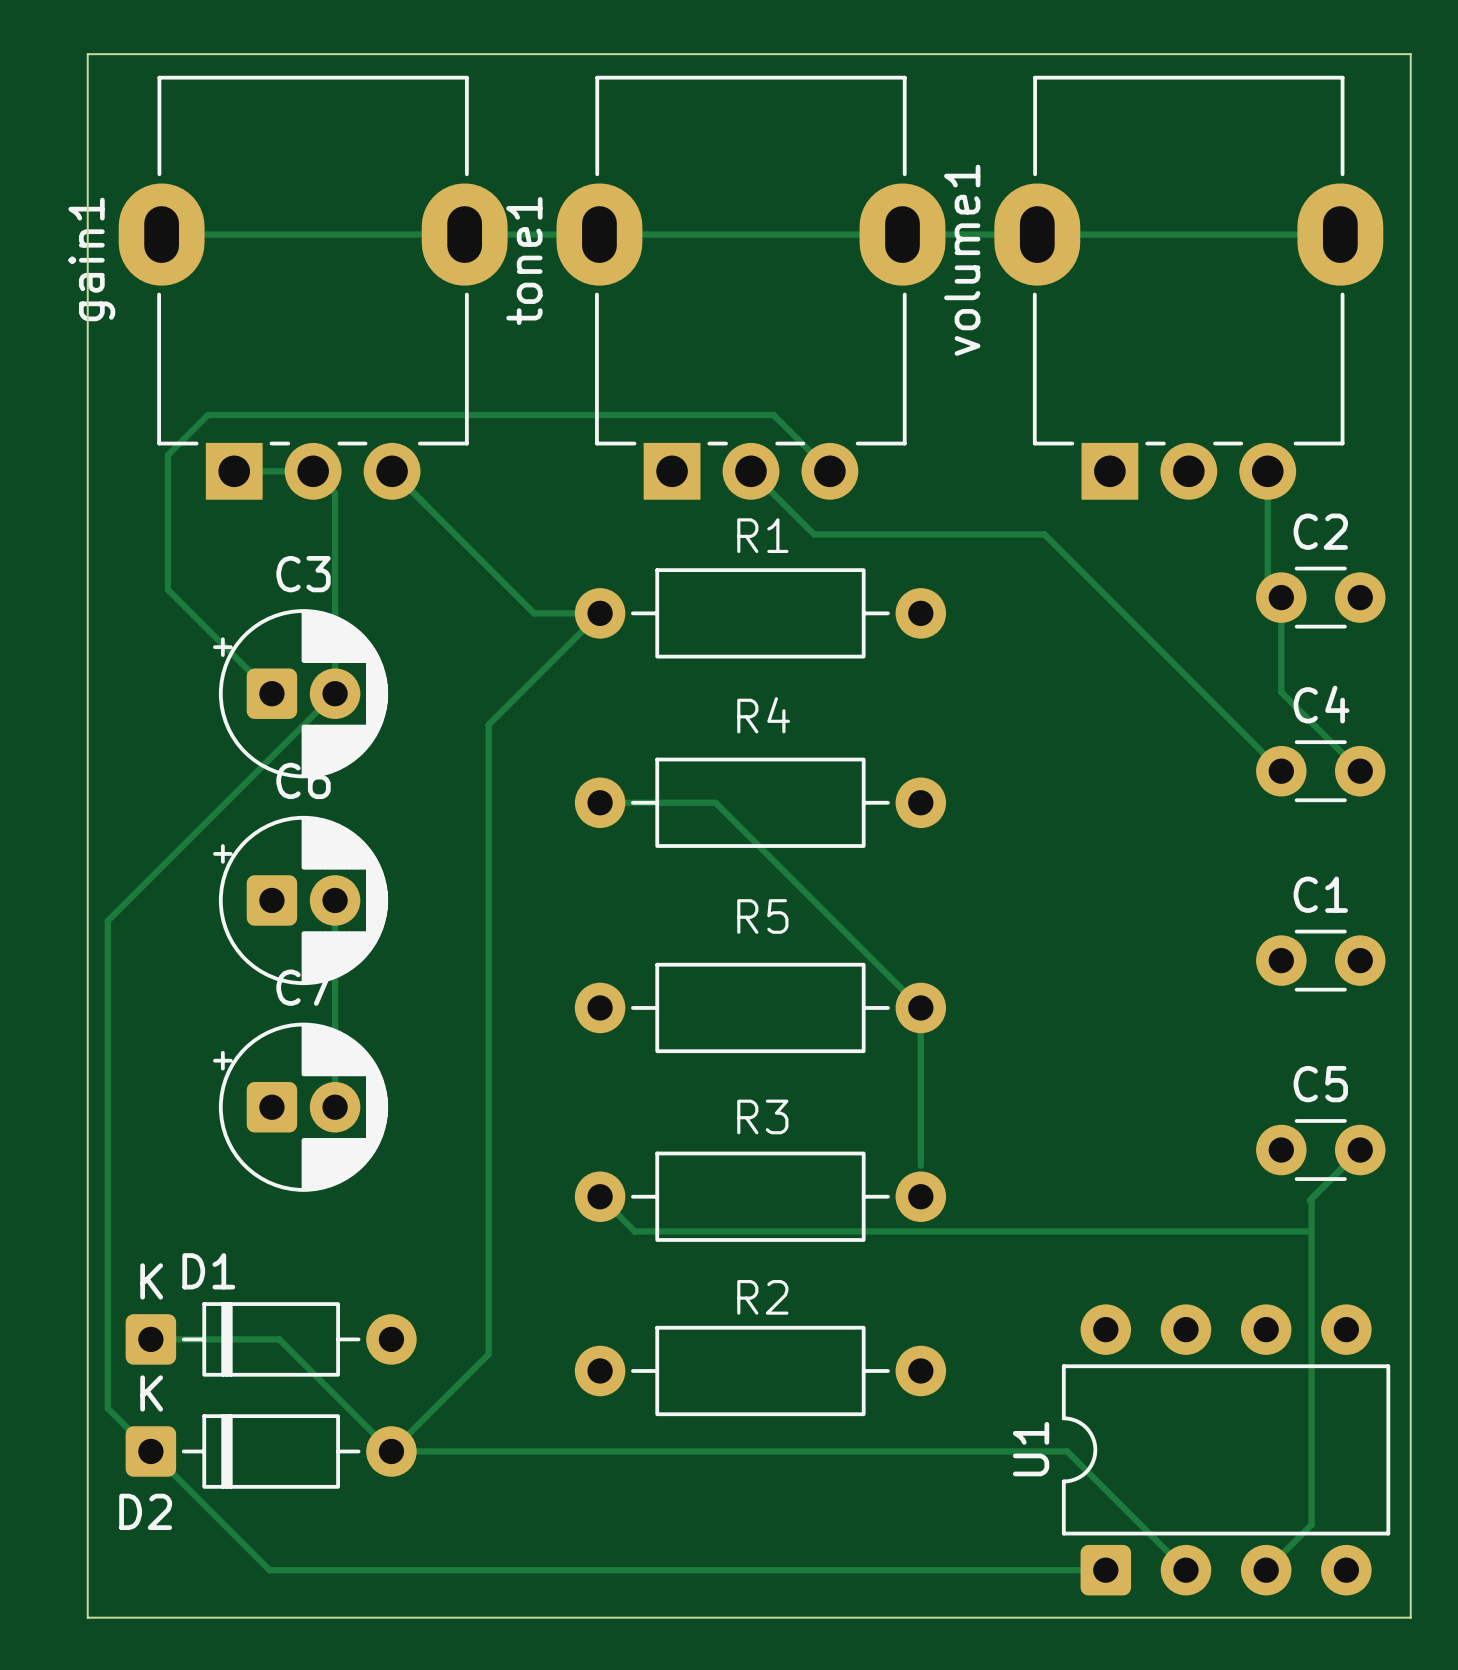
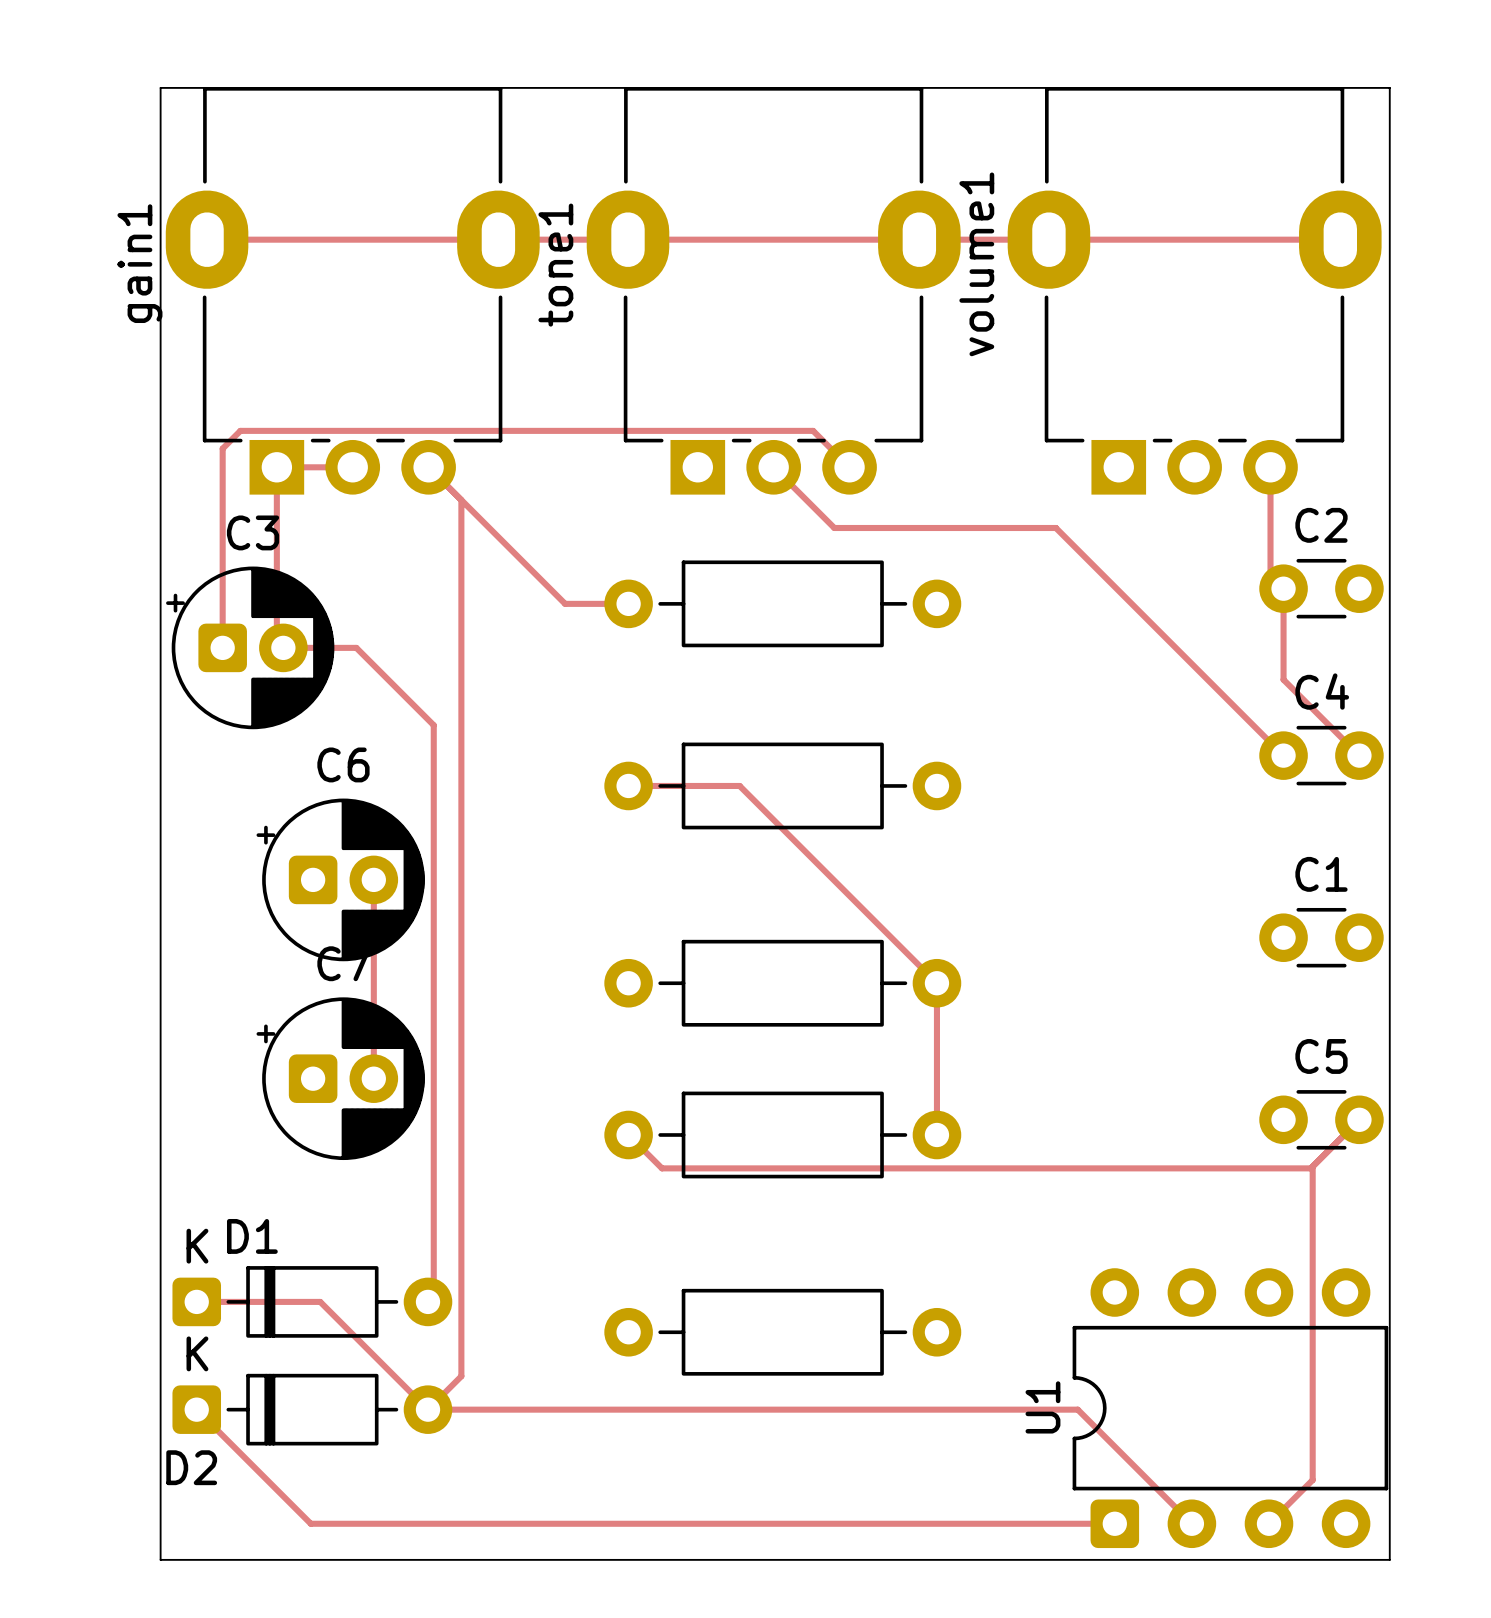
board edge: (87, 54) (1410, 54) (1410, 1617) (87, 1617) (87, 54) -> (160, 87) (160, 1559) (1389, 1559) (1389, 87) (160, 87)
track: (792, 433) (773, 414) (208, 414) (167, 455) (167, 589) (271, 693) -> (813, 430) (240, 430) (222, 448) (222, 647)
track: none -> (276, 467) (276, 641) (283, 647) (356, 647) (433, 725) (433, 1296)
track: (313, 471) (335, 493) (335, 693) -> none
text: R1 (762, 535) -> none
track: (600, 613) (488, 724) (488, 1354) (426, 1416) -> (461, 500) (461, 1376)
C3 position: (300, 693) -> (250, 647)
track: (335, 693) (107, 920) (107, 1408) (150, 1451) -> none
text: R4 (763, 715) -> none
text: R5 (762, 916) -> none
text: R3 (762, 1116) -> none
track: (600, 1196) (634, 1231) (1309, 1231) -> (628, 1134) (661, 1168) (1310, 1168)
part position: (760, 1196) -> (782, 1134)
text: R2 (762, 1297) -> none

